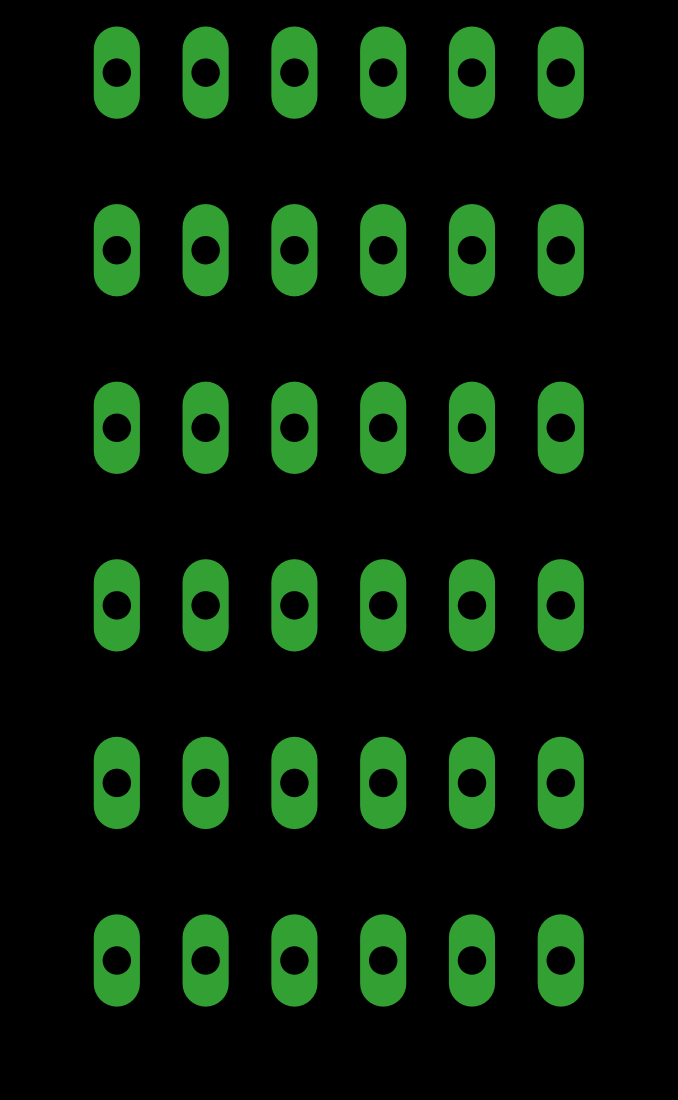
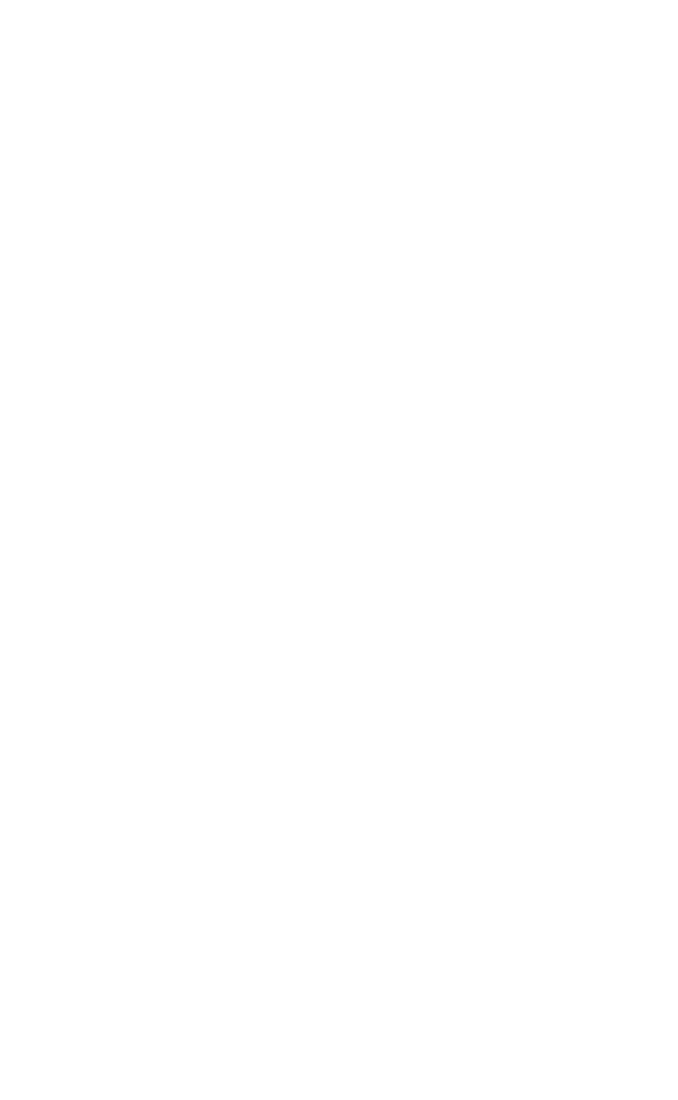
part: (338, 72) -> none
part: (338, 250) -> none
part: (338, 427) -> none
part: (338, 605) -> none
part: (338, 782) -> none
part: (338, 960) -> none

